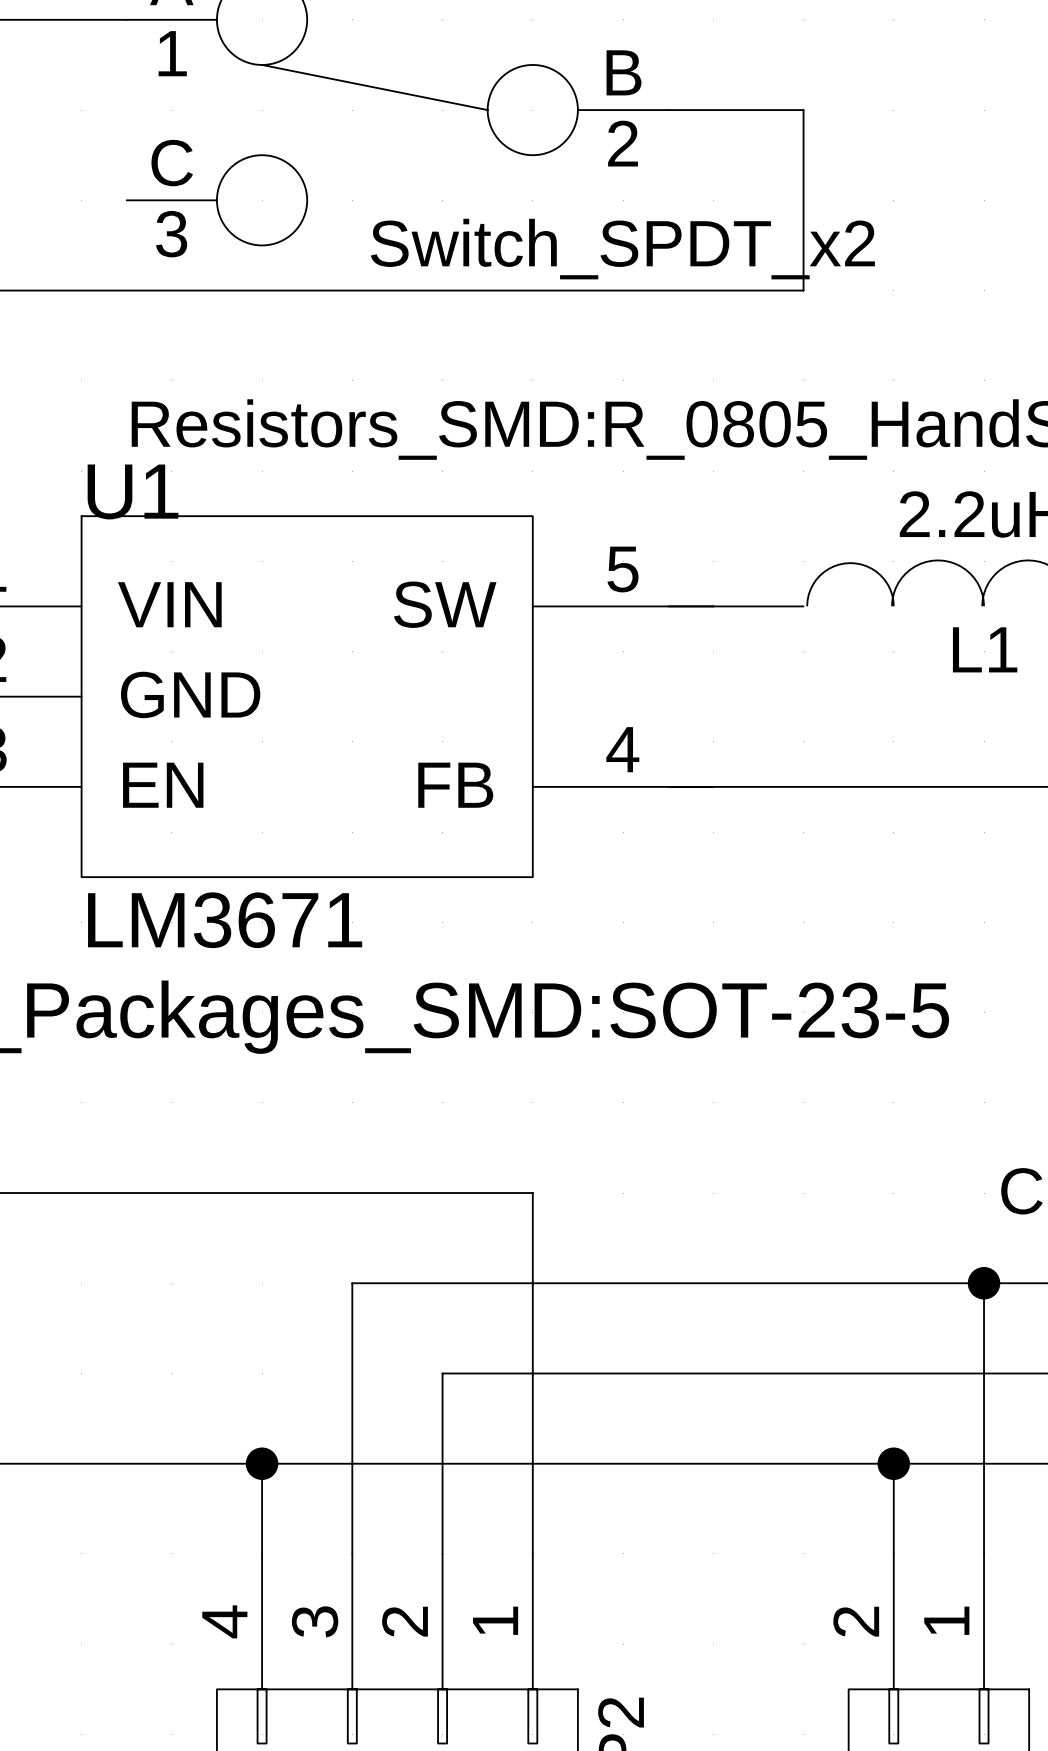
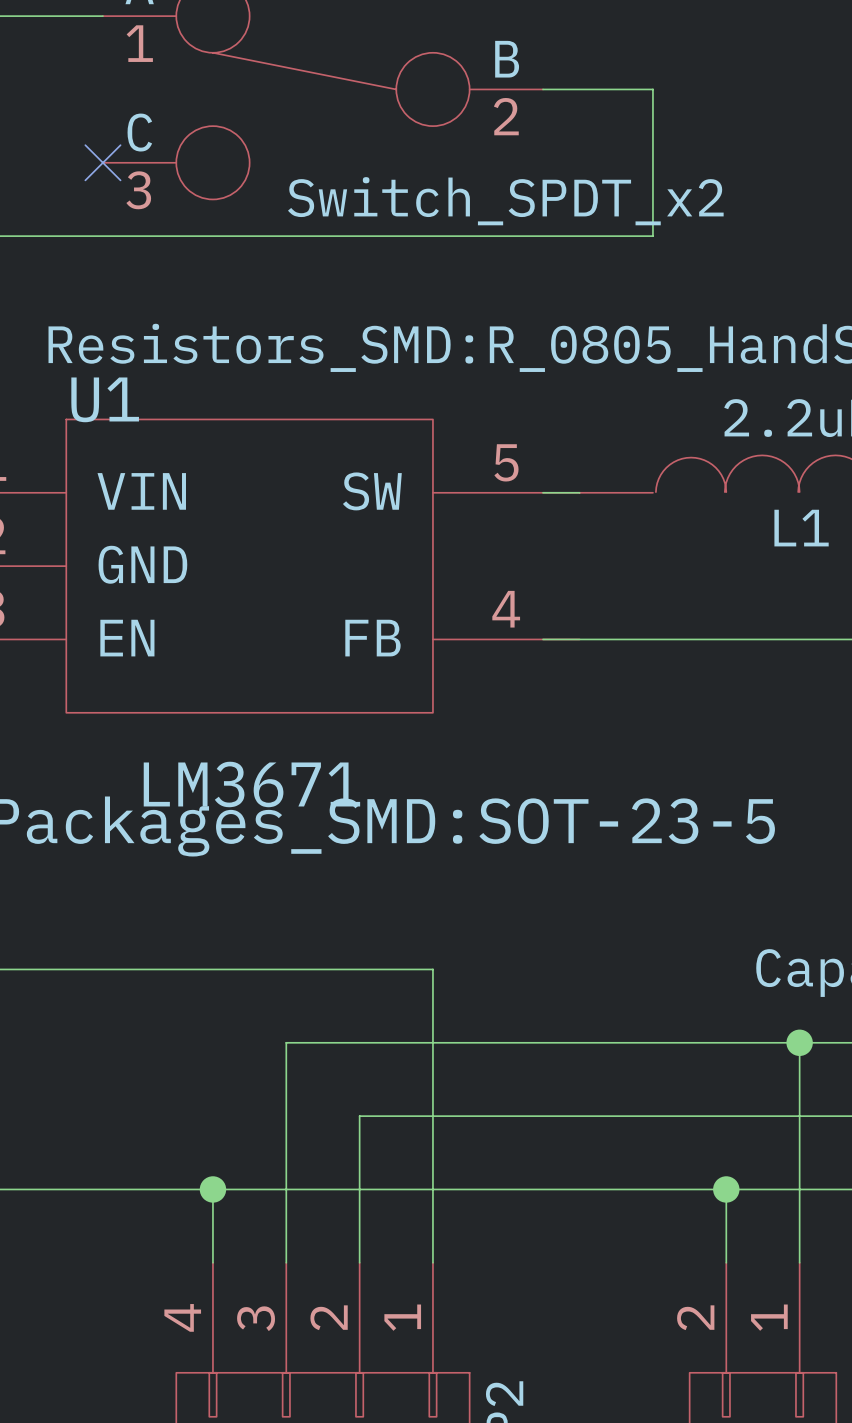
no-connect mark: none -> (102, 162)
U1 value position: LM3671 (225, 920) -> LM3671 (251, 784)

